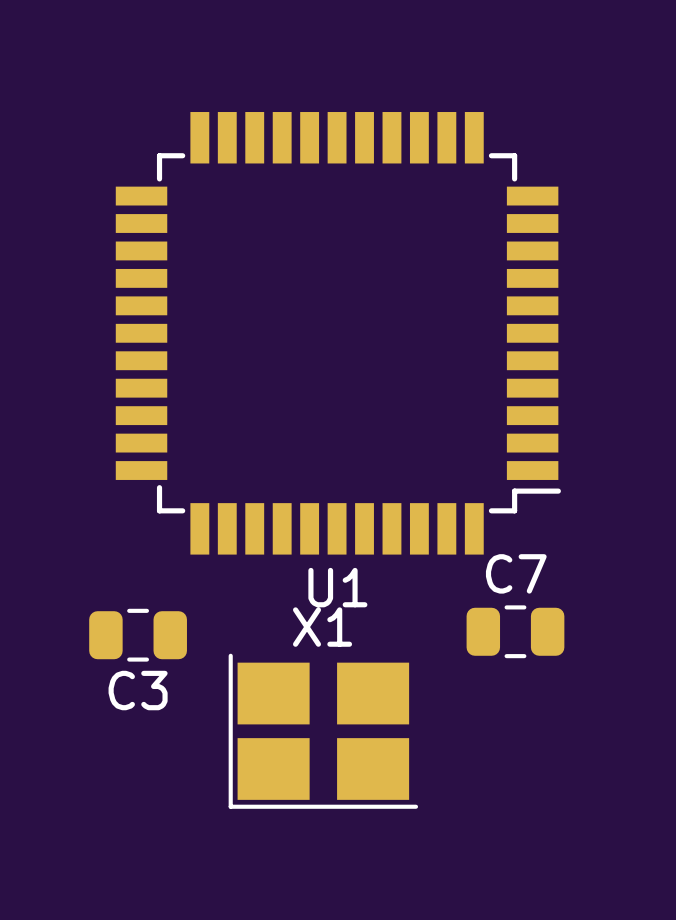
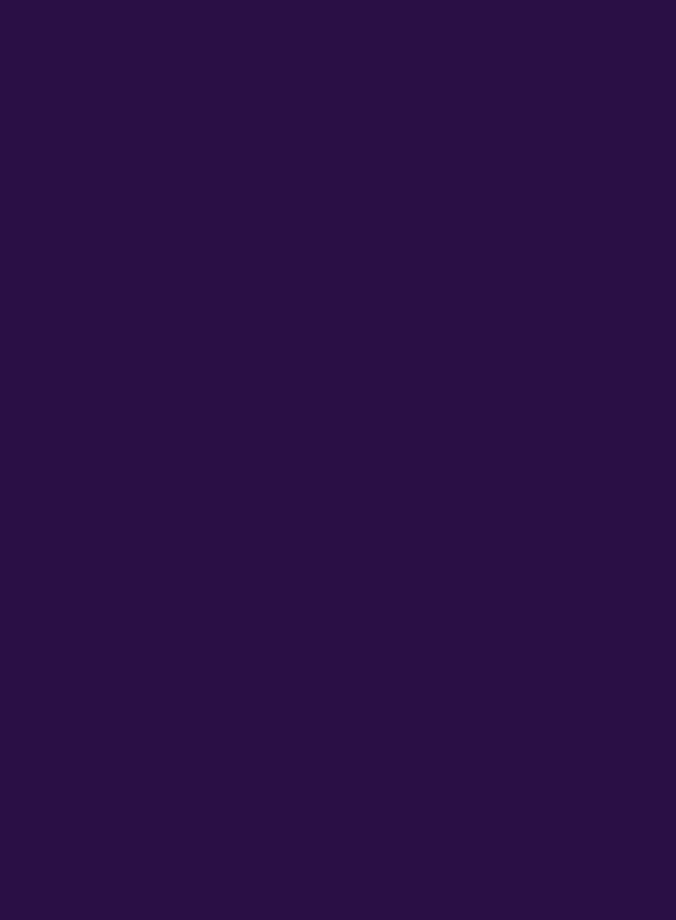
U1: (338, 333) -> none
C7: (515, 631) -> none
C3: (138, 635) -> none
X1: (323, 731) -> none

